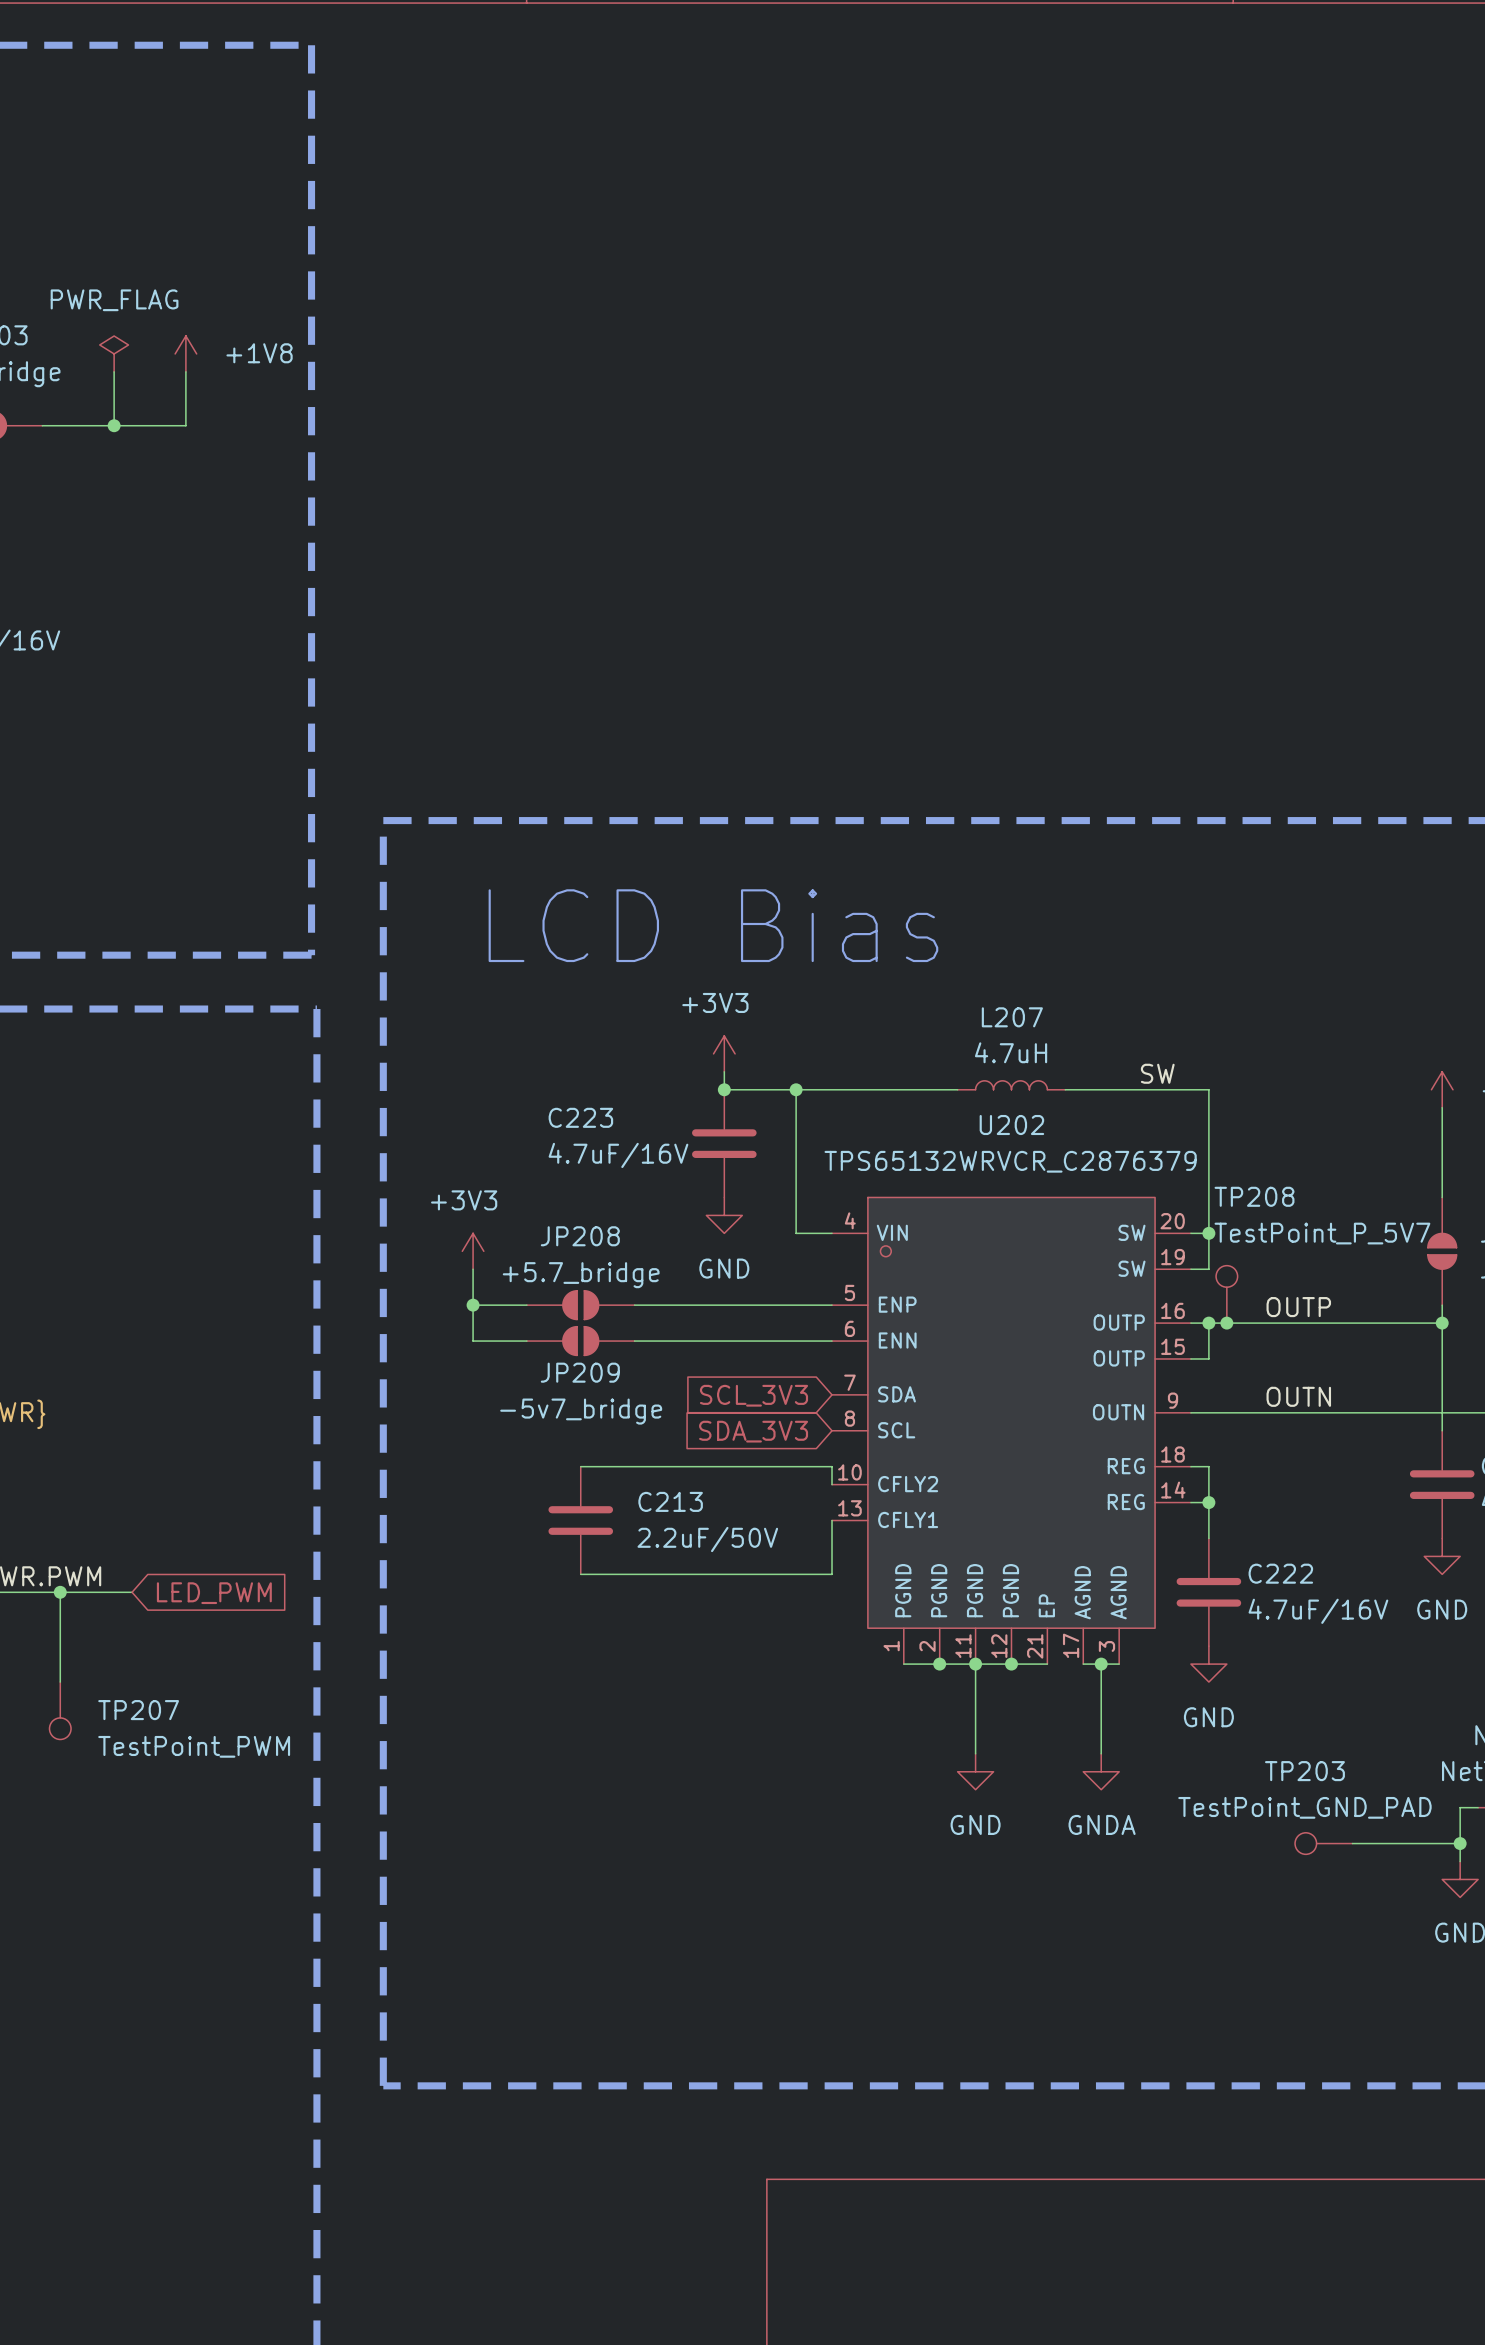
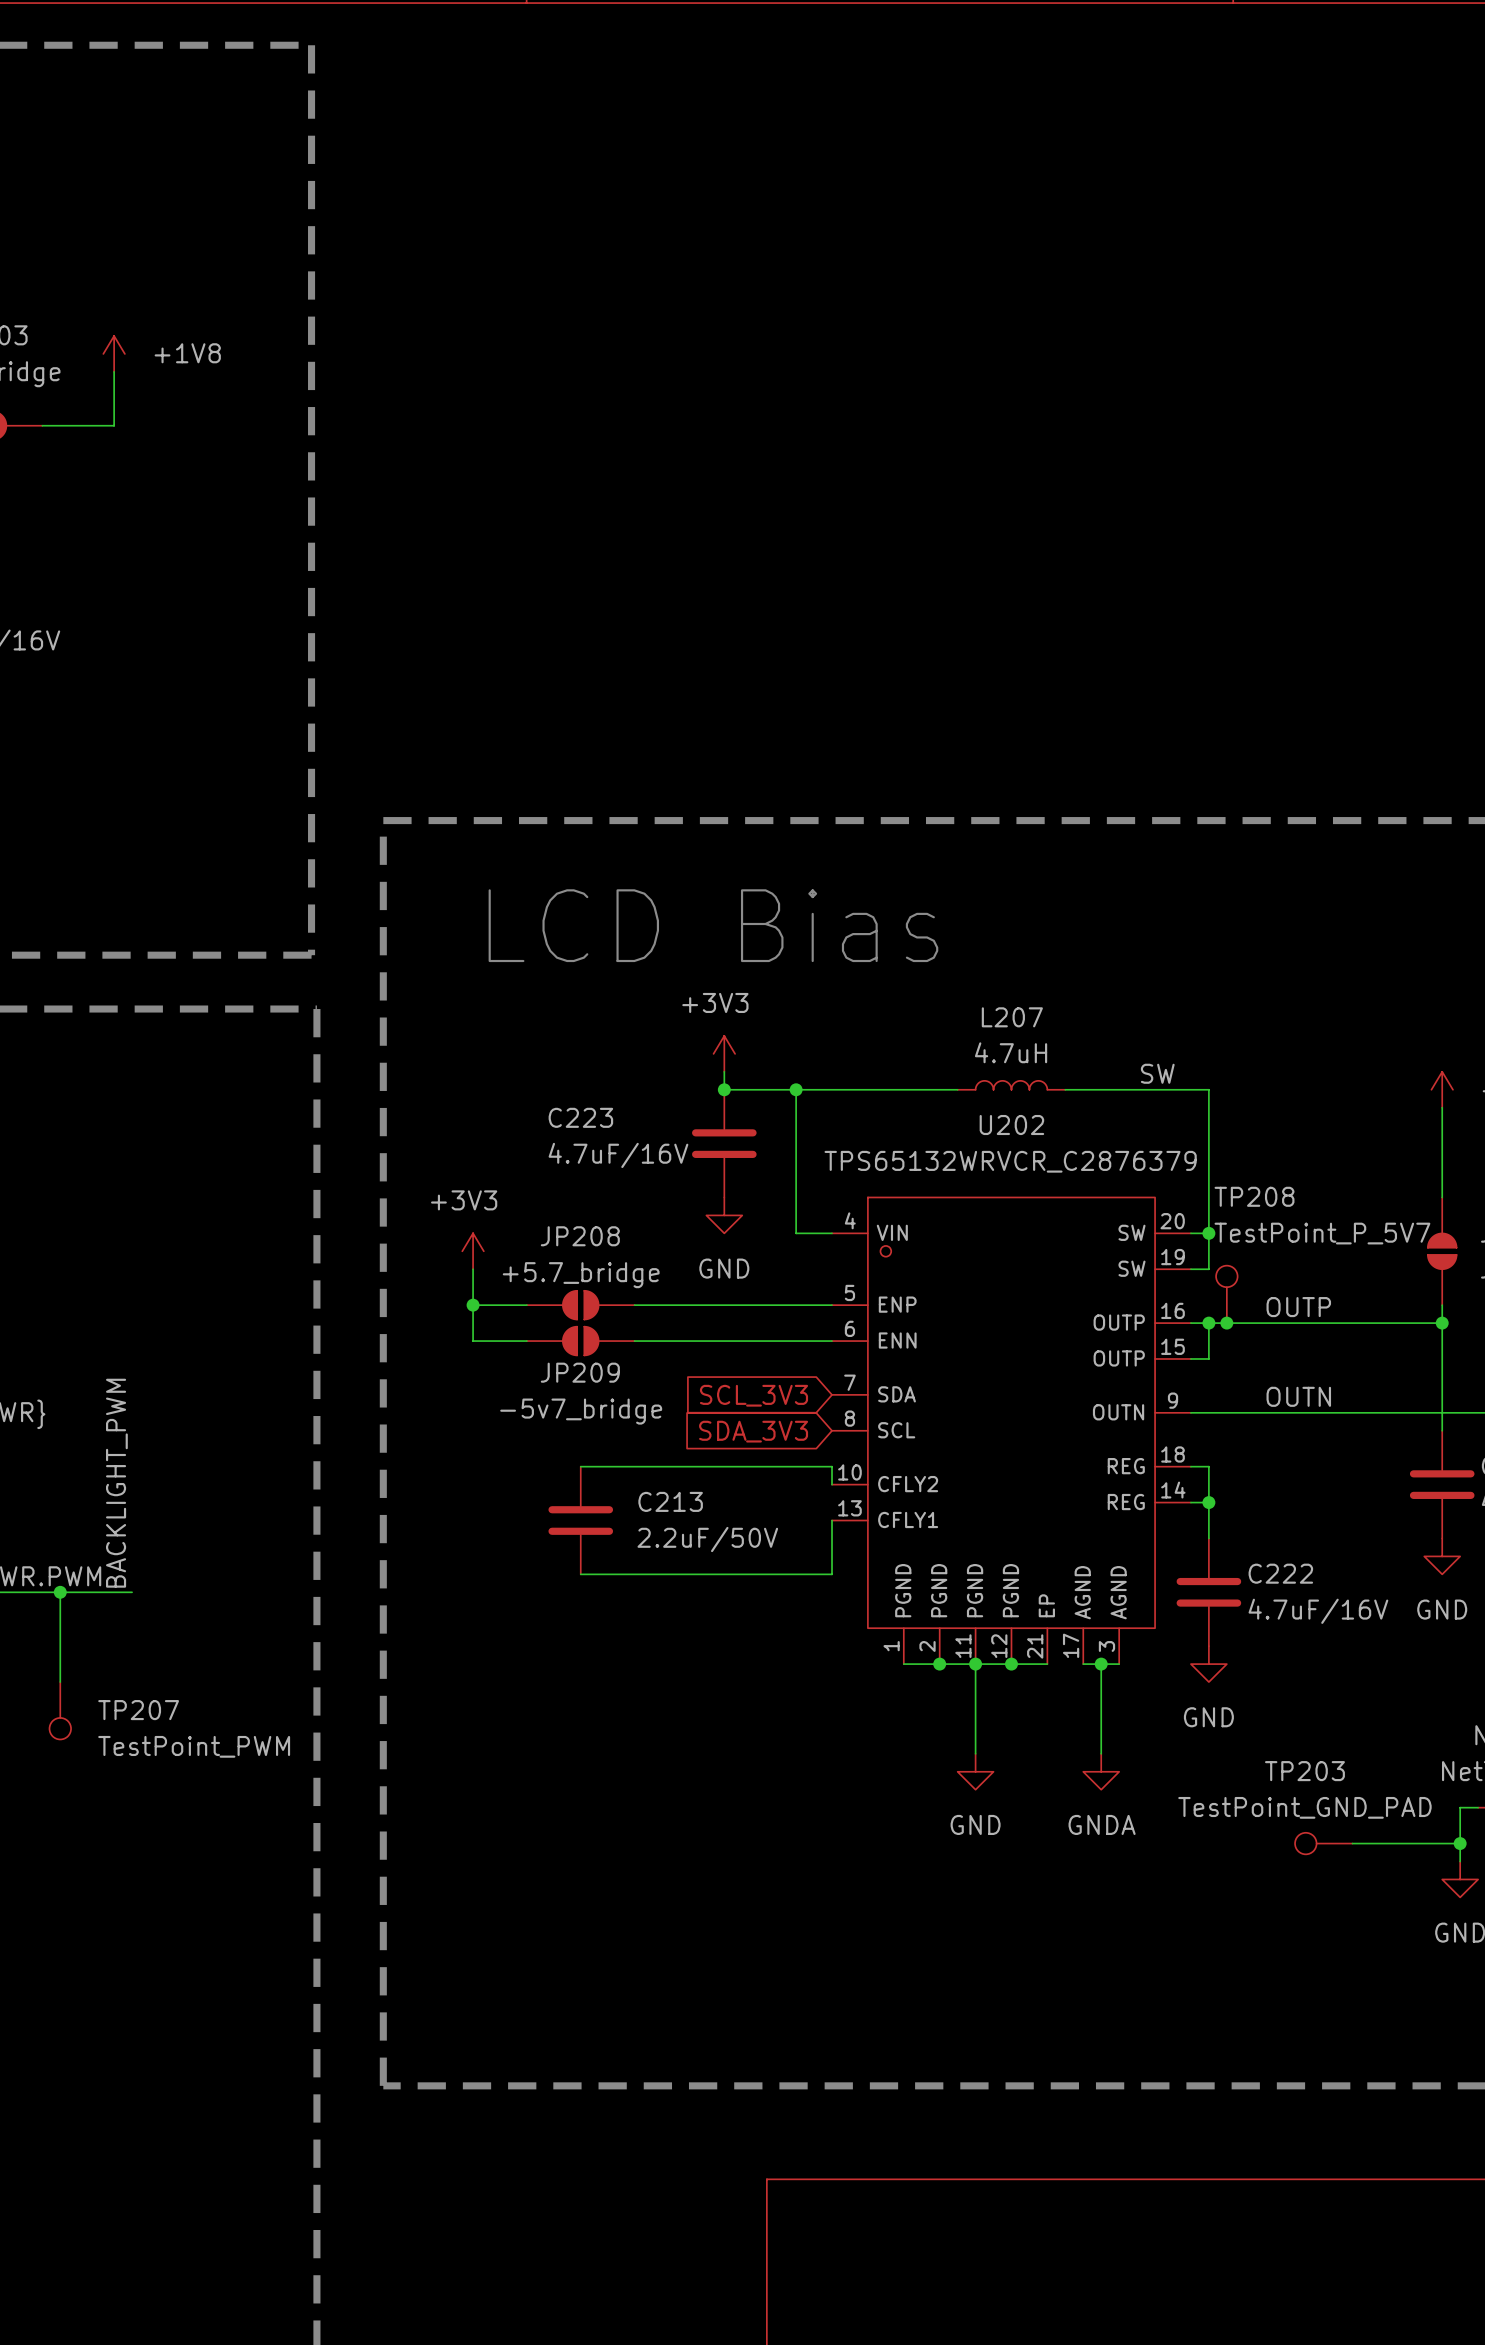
power symbol: PWR_FLAG (114, 353) -> +1V8 (114, 353)
power symbol: +1V8 (185, 353) -> none
wire: (185, 371) (185, 425) (114, 425) -> none
junction: (114, 425) -> none
label: none -> BACKLIGHT_PWM (116, 1483)
global label: LED_PWM (214, 1593) -> none

